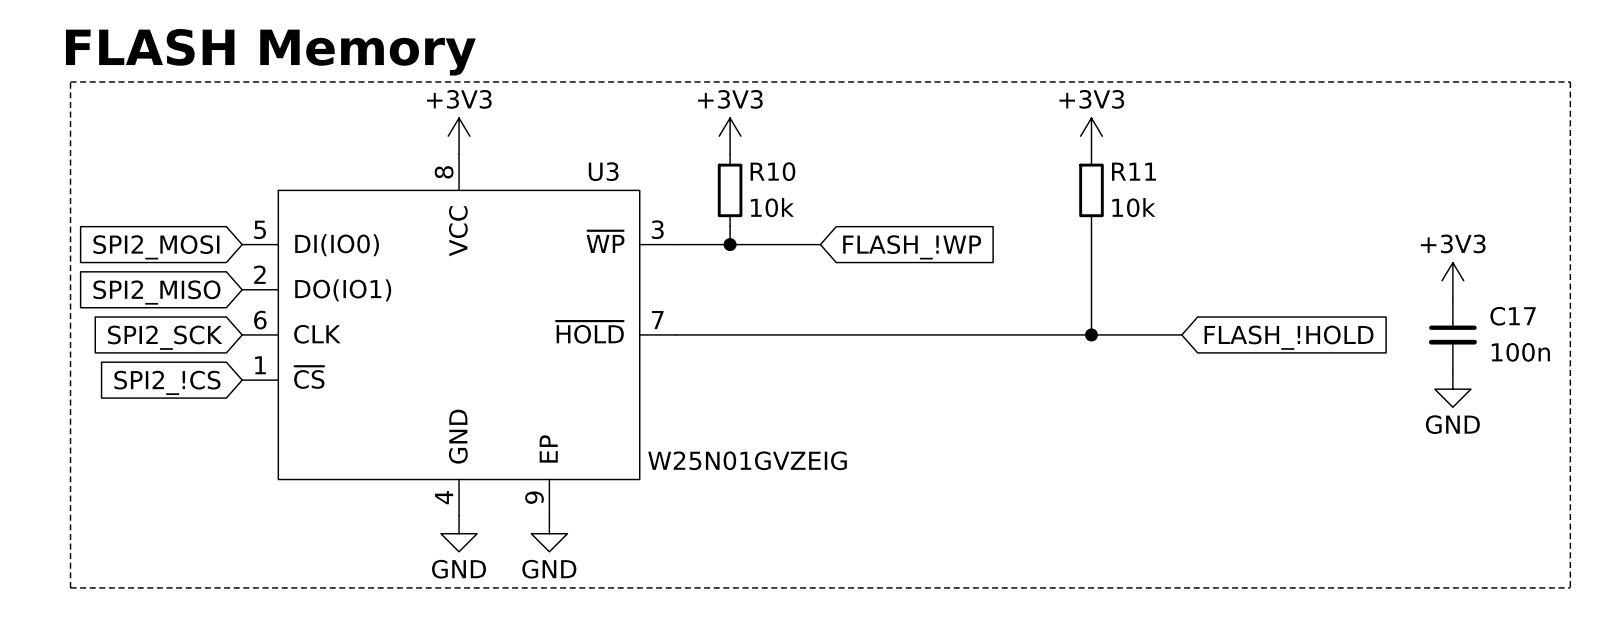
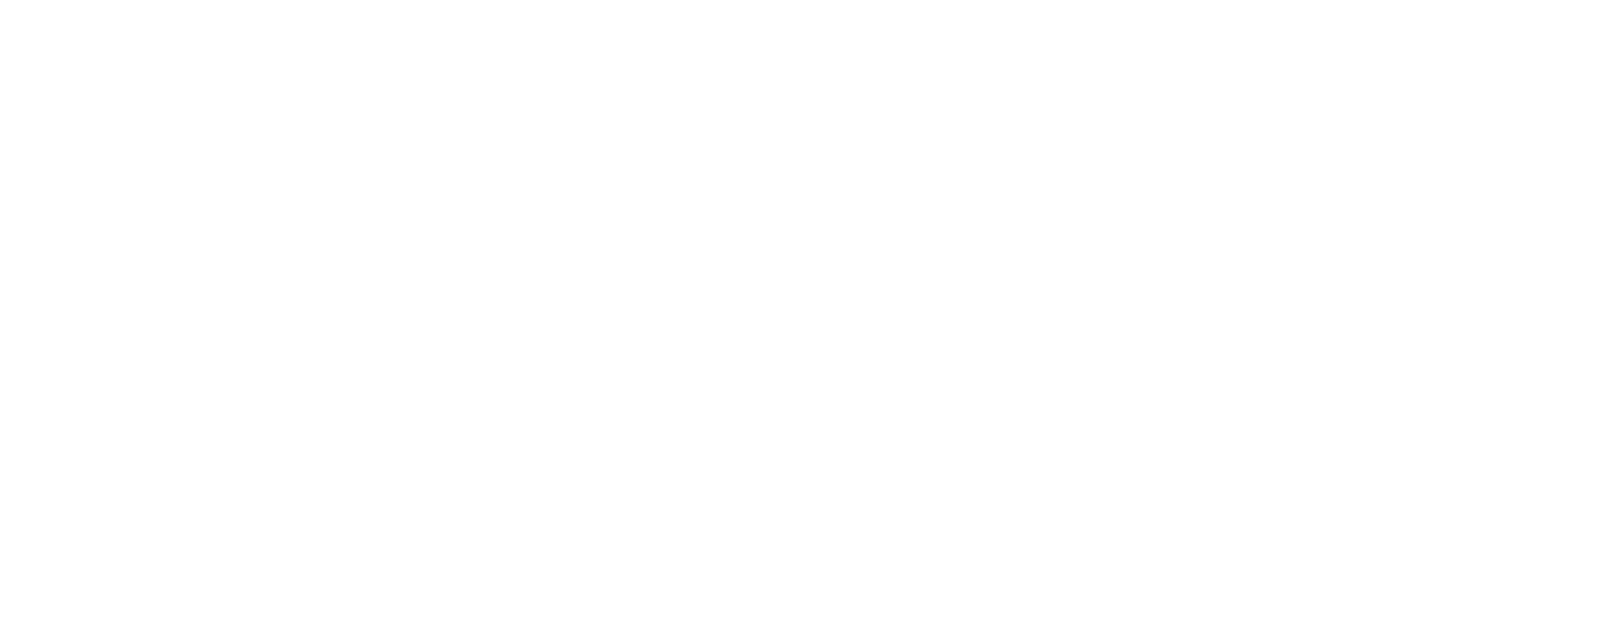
text: FLASH Memory (270, 52) -> none
line: (70, 81) (70, 587) (1570, 587) (1570, 81) (70, 81) -> none
power symbol: +3V3 (459, 136) -> none
power symbol: +3V3 (730, 136) -> none
power symbol: +3V3 (1091, 136) -> none
R10: 10k (730, 190) -> none
R11: 10k (1091, 190) -> none
wire: (730, 226) (730, 244) -> none
wire: (1091, 226) (1091, 334) -> none
wire: (675, 244) (820, 244) -> none
junction: (730, 244) -> none
global label: SPI2_MOSI (156, 247) -> none
global label: FLASH_!WP (912, 247) -> none
power symbol: +3V3 (1452, 280) -> none
global label: SPI2_MISO (156, 292) -> none
U3: W25N01GVZEIG (459, 334) -> none
wire: (675, 334) (1181, 334) -> none
junction: (1091, 334) -> none
C17: 100n (1452, 334) -> none
global label: SPI2_SCK (165, 337) -> none
global label: FLASH_!HOLD (1289, 337) -> none
global label: SPI2_!CS (167, 382) -> none
power symbol: GND (1452, 389) -> none
power symbol: GND (459, 533) -> none
power symbol: GND (549, 533) -> none

